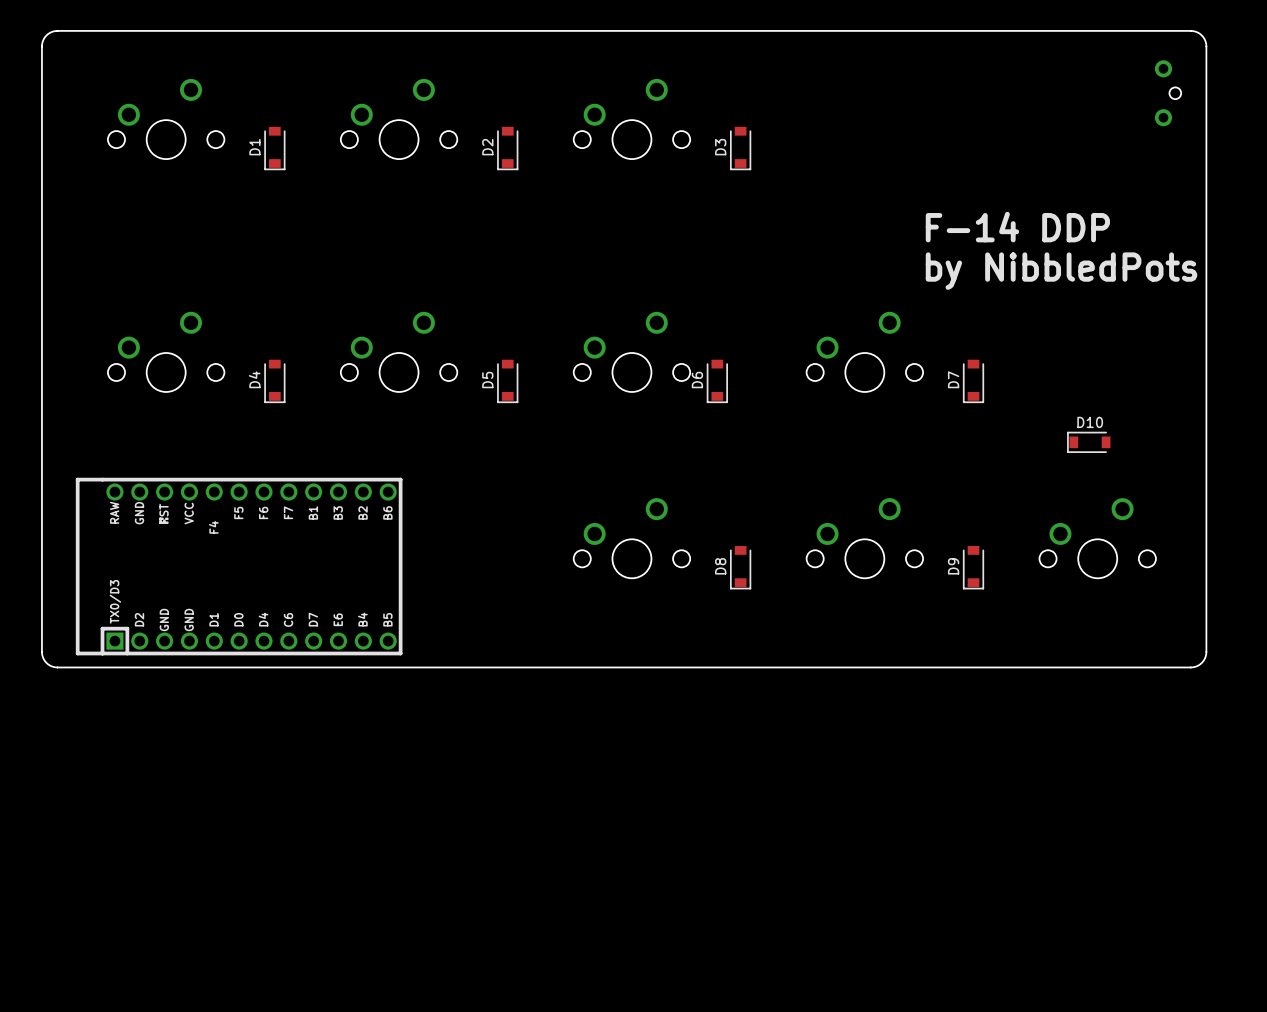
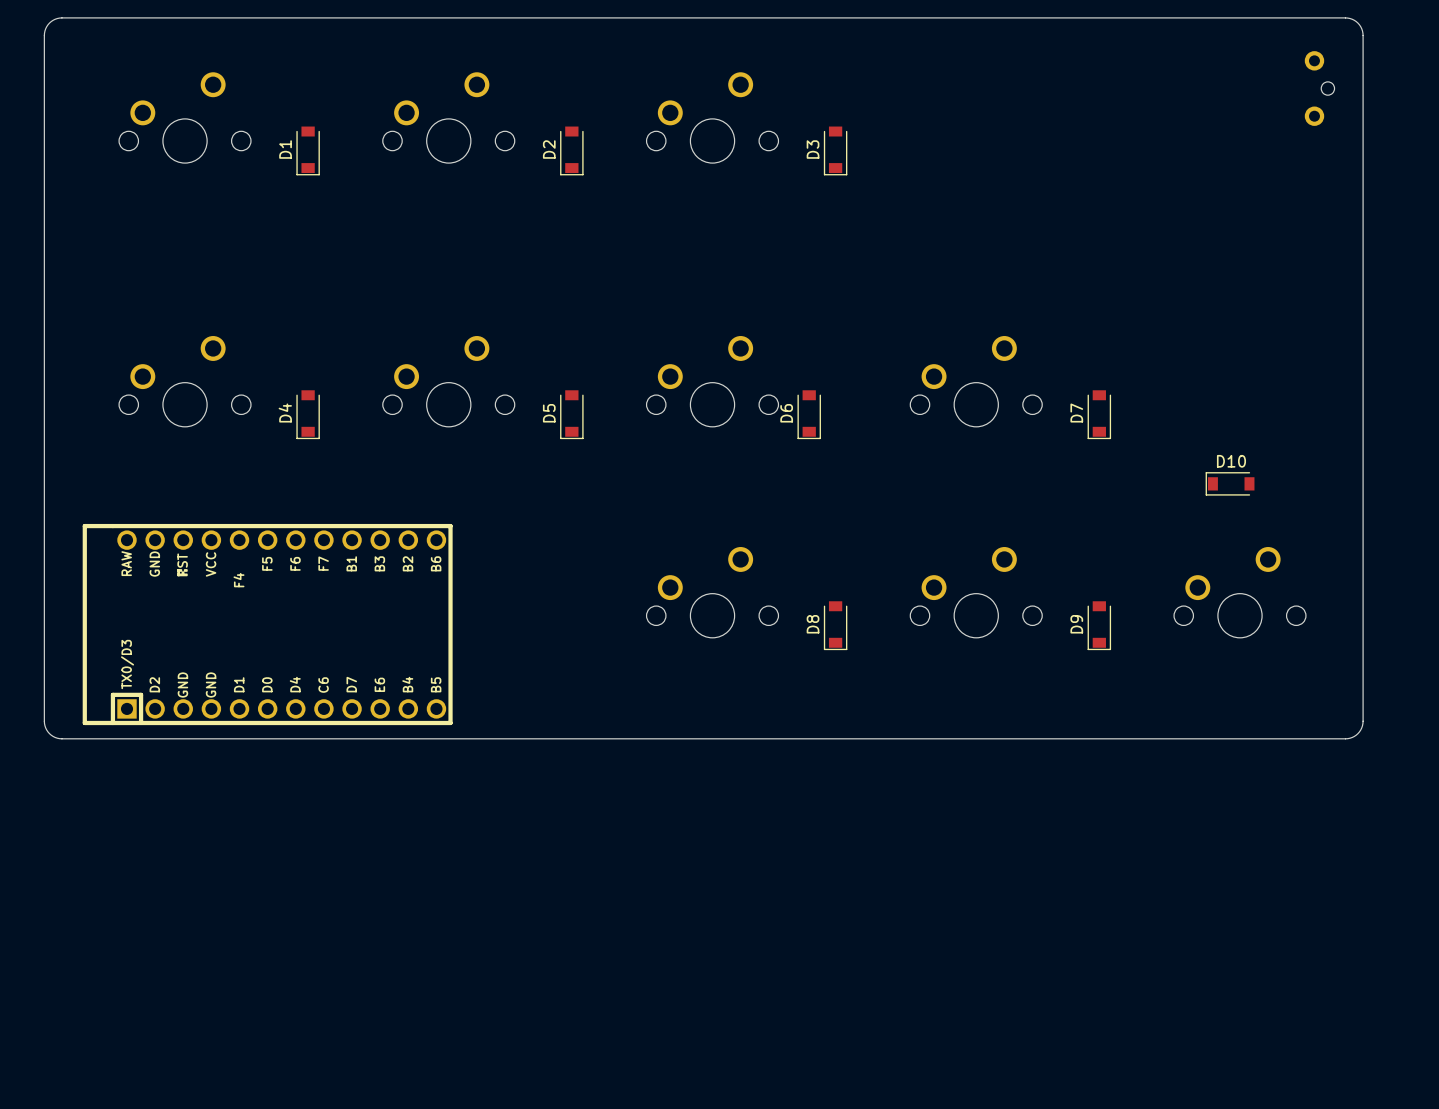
text: F-14 DDP (1017, 227) -> none
text: by NibbledPots (1061, 271) -> none

